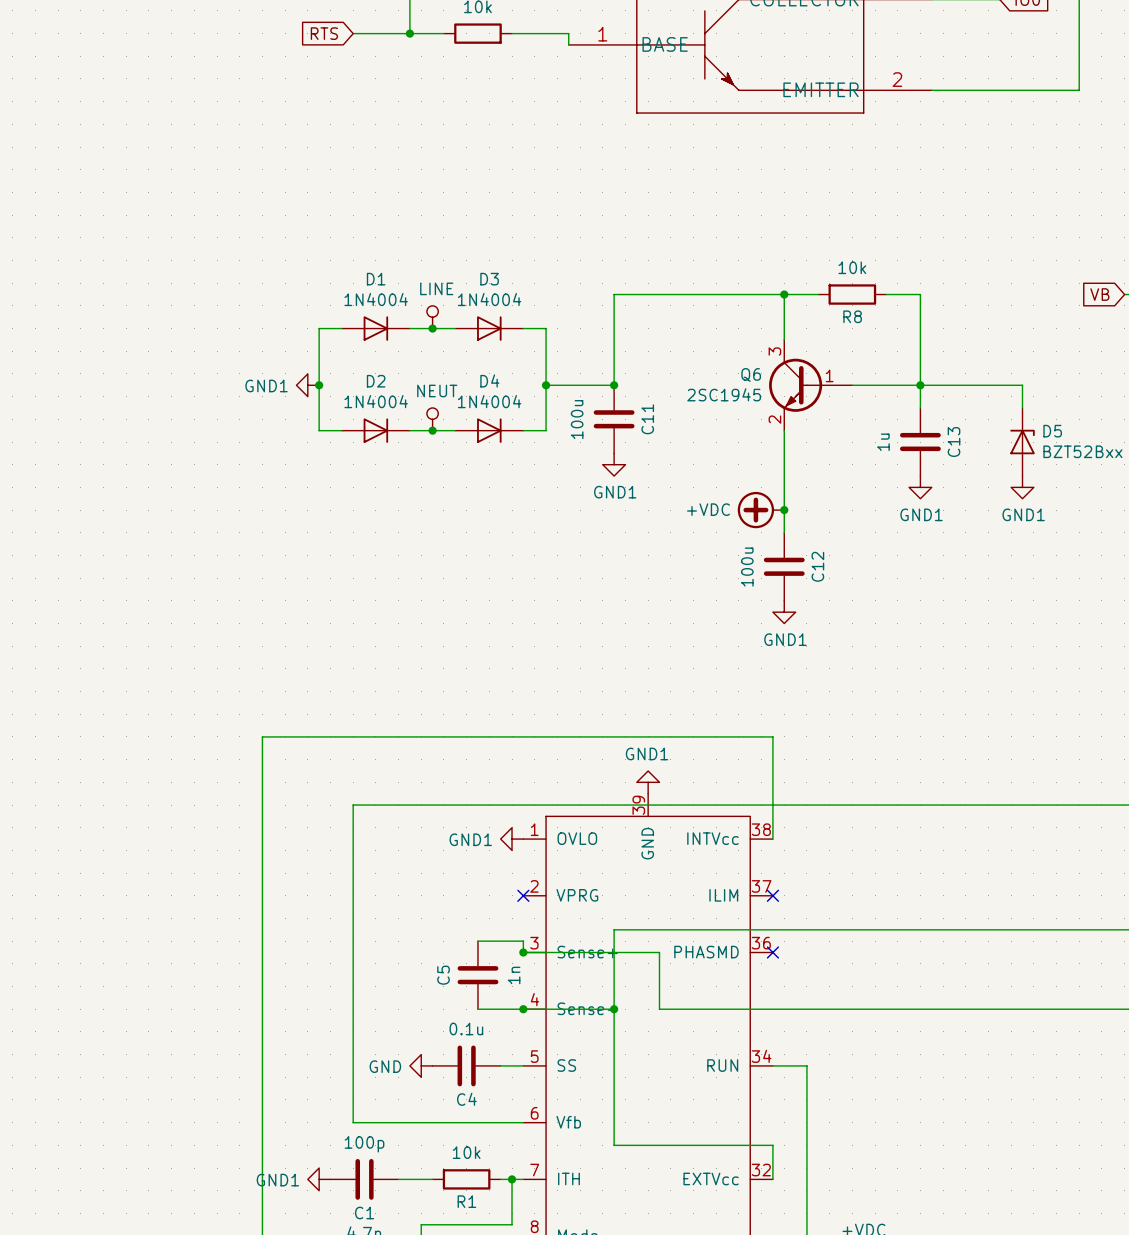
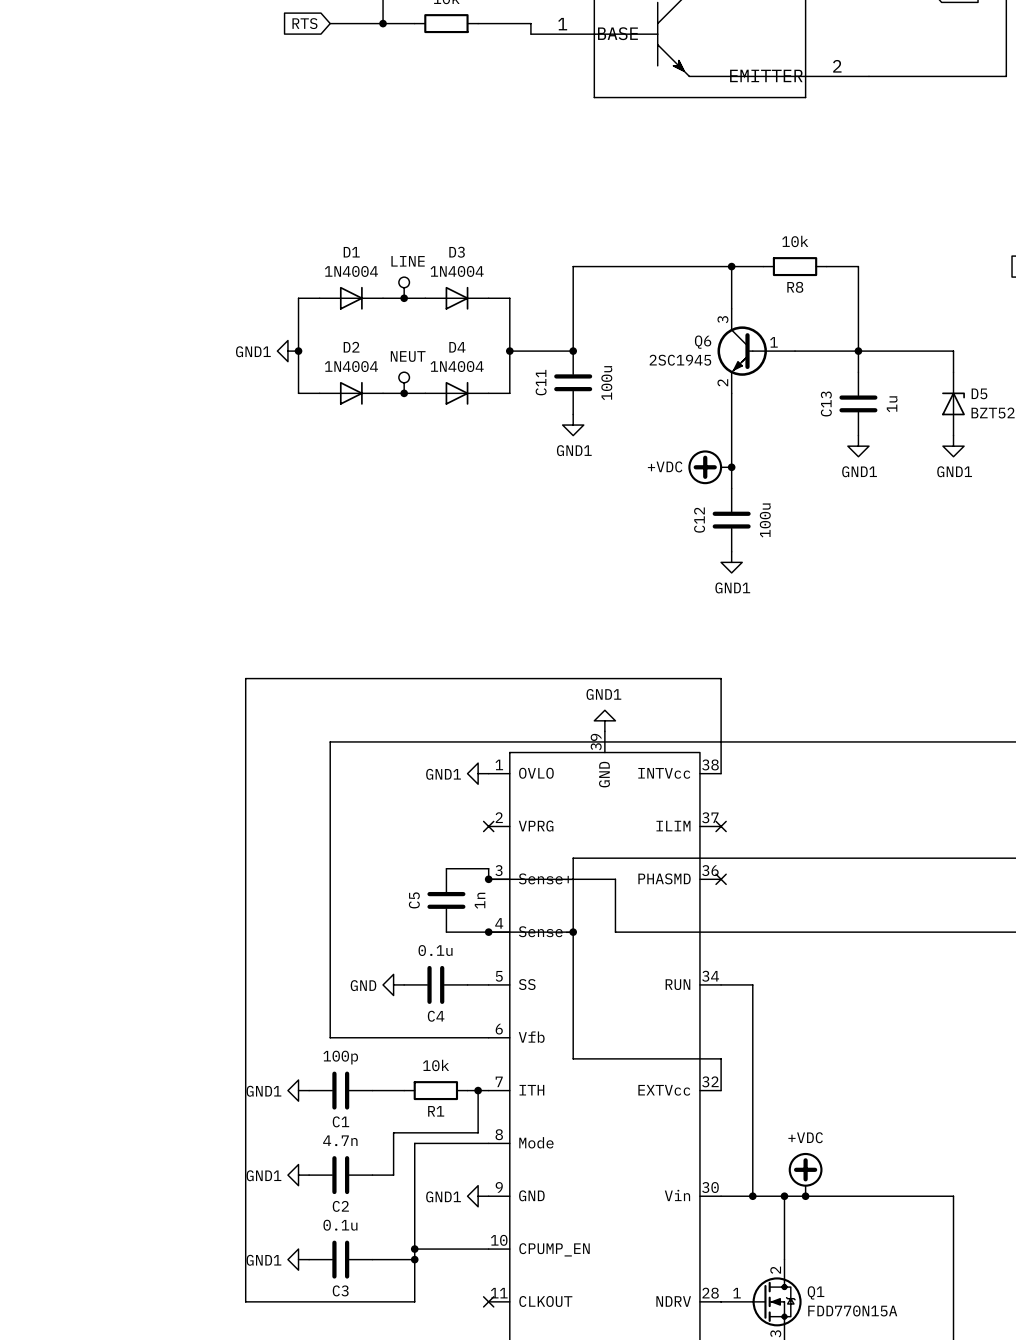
C11 value position: 100u (577, 419) -> 100u (606, 383)
C11 name position: C11 (647, 419) -> C11 (541, 382)
C13 value position: 1u (883, 442) -> 1u (892, 404)
C13 name position: C13 (954, 442) -> C13 (826, 404)
C12 name position: C12 (817, 566) -> C12 (699, 520)
C12 value position: 100u (747, 567) -> 100u (765, 520)

